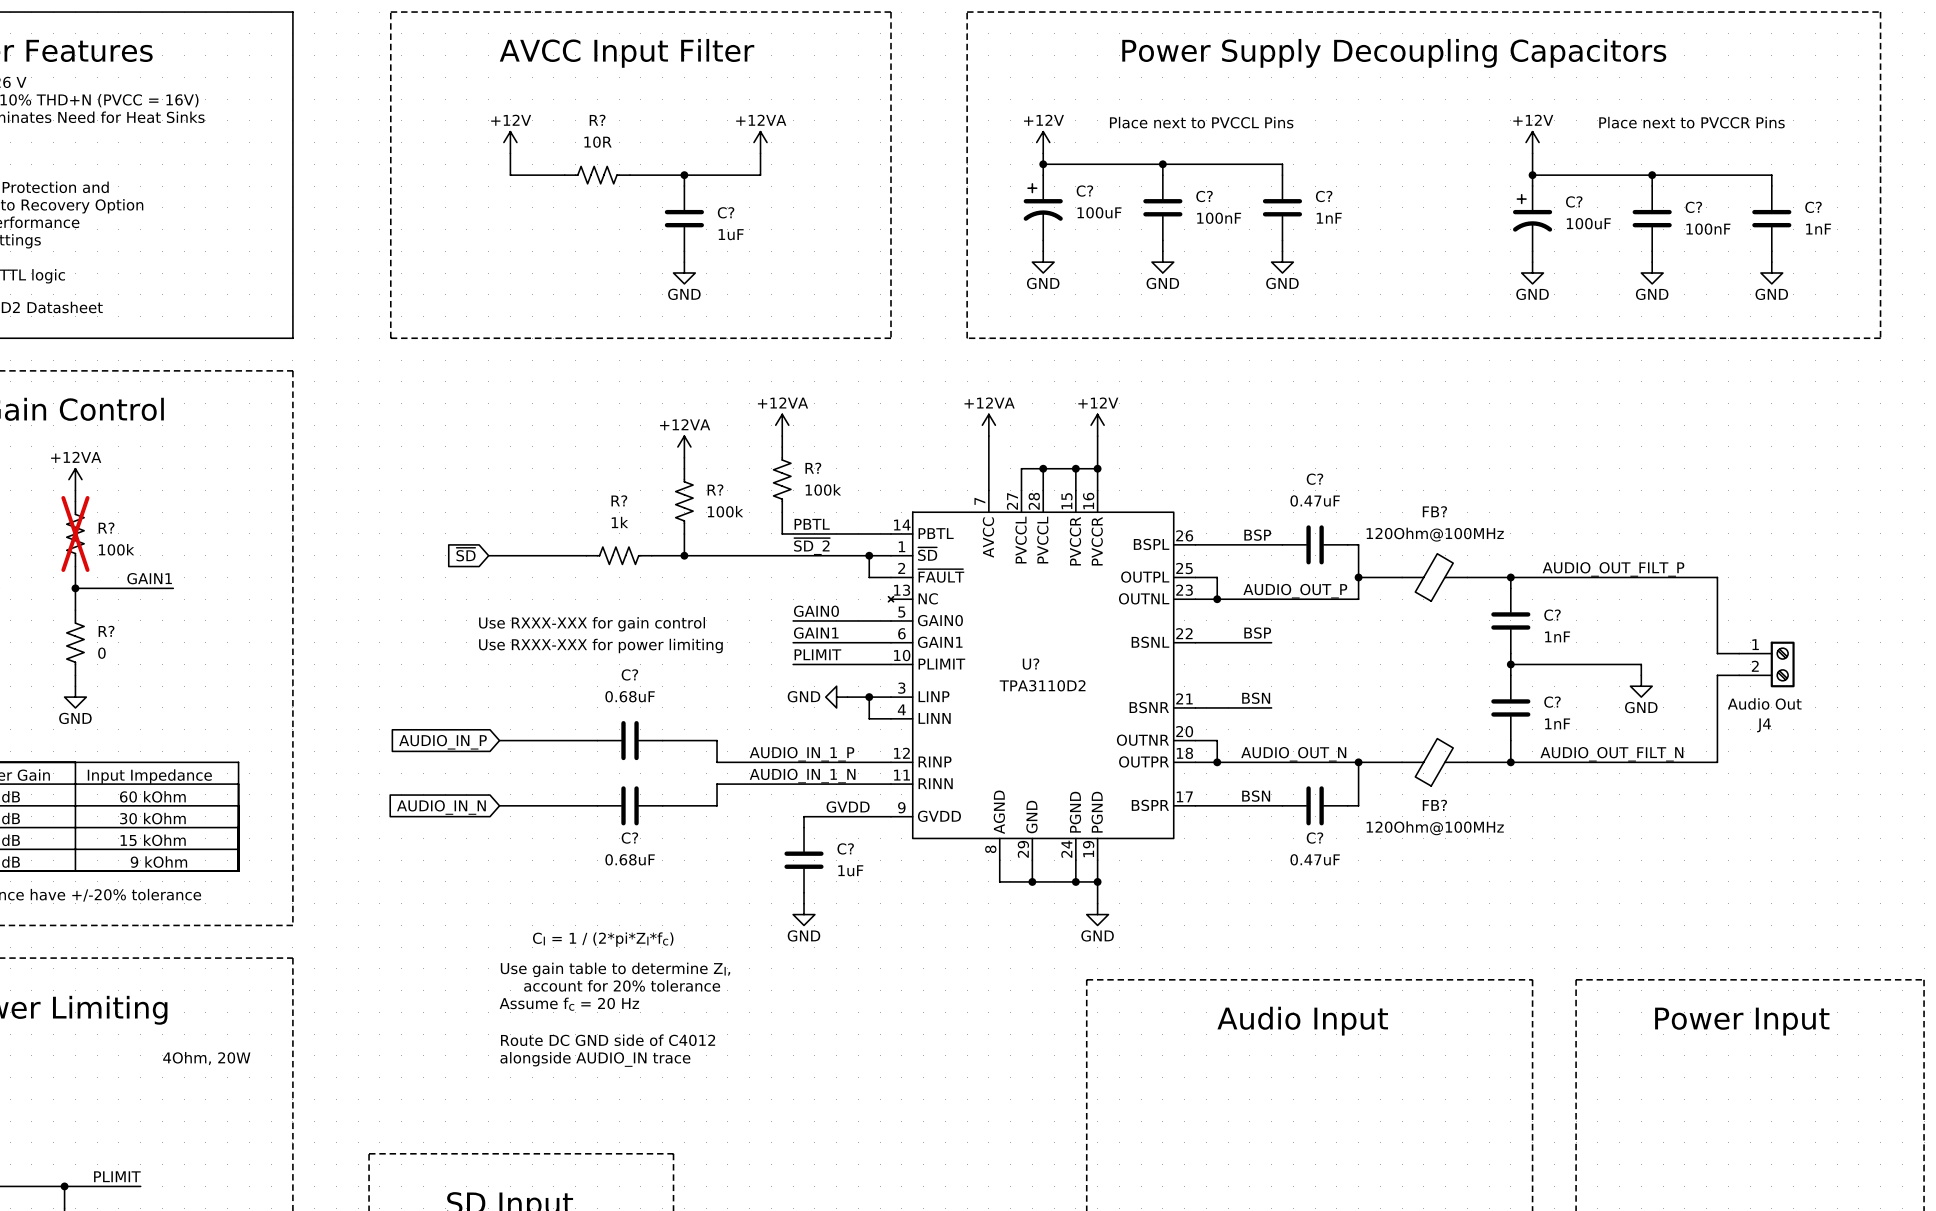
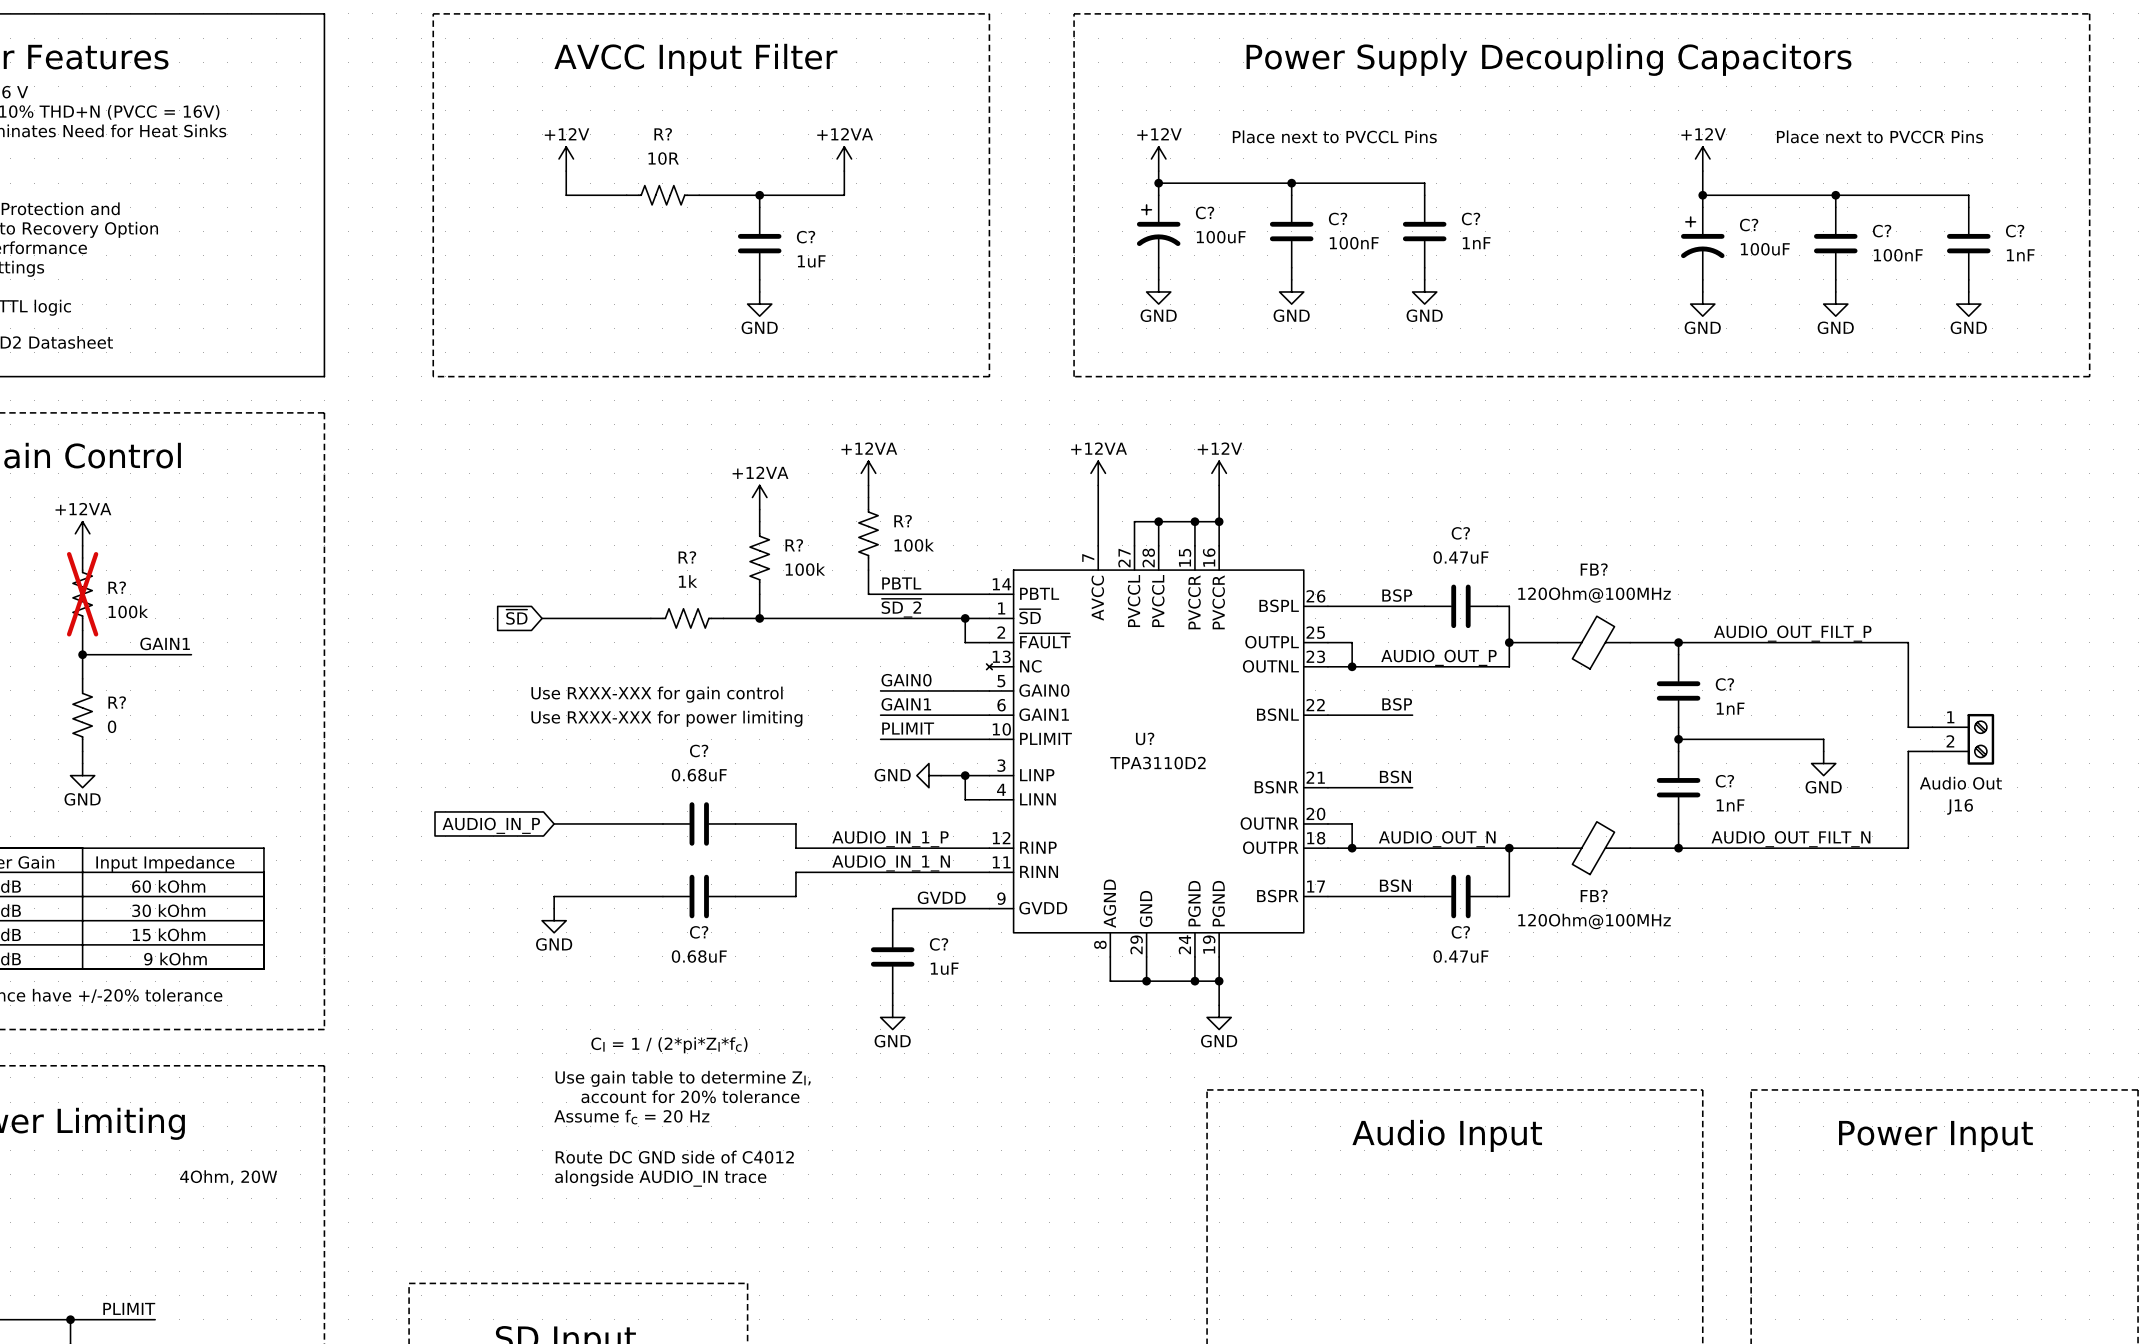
J4 name: J4 (1764, 725) -> J16 (1960, 806)
wire: none -> (554, 896) (554, 908)
global label: AUDIO_IN_N (441, 807) -> none
power symbol: none -> GND (554, 920)

